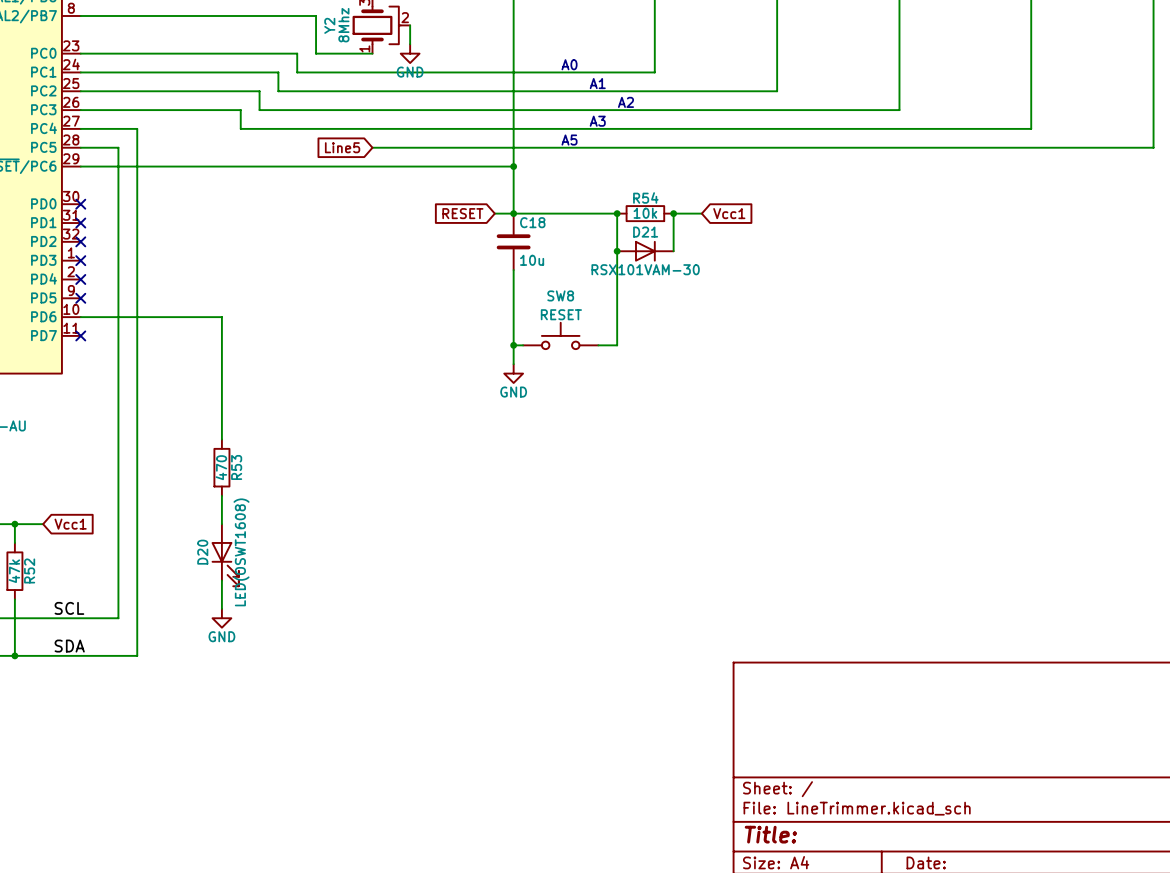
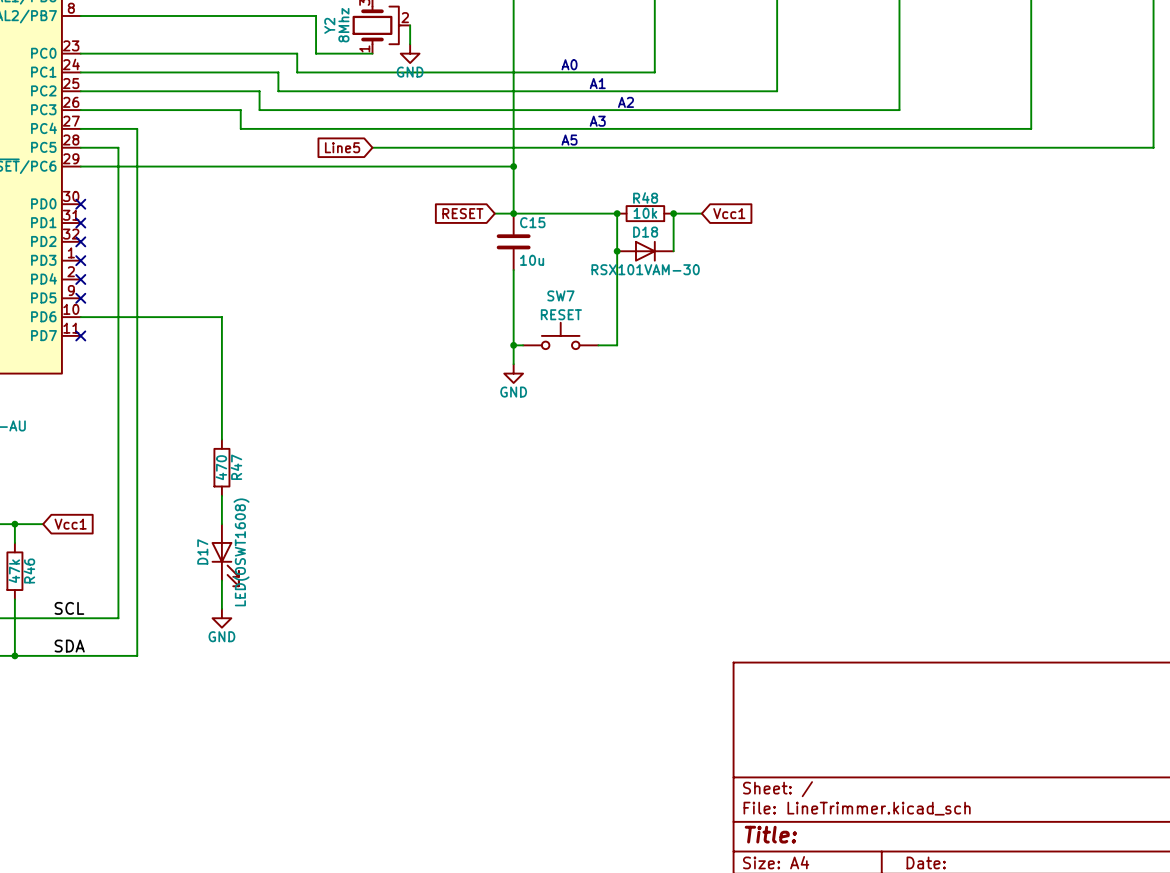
R54 name: R54 (645, 197) -> R48 (645, 197)
C18 name: C18 (532, 222) -> C15 (532, 222)
D21 name: D21 (645, 232) -> D18 (645, 232)
SW8 name: SW8 (560, 295) -> SW7 (560, 295)
R53 name: R53 (236, 467) -> R47 (236, 467)
D20 name: D20 (202, 552) -> D17 (202, 551)
R52 name: R52 (29, 570) -> R46 (29, 570)

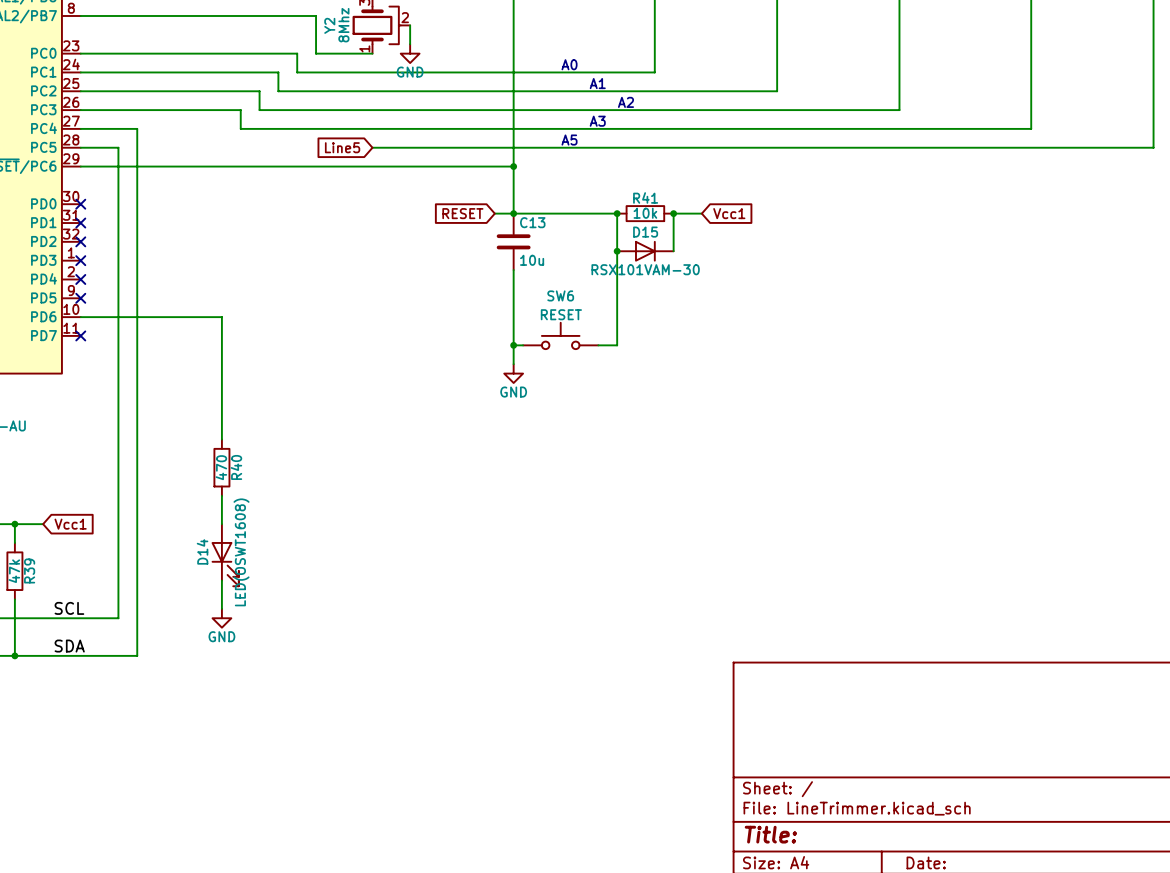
R48 name: R48 (645, 197) -> R41 (645, 197)
C15 name: C15 (532, 222) -> C13 (532, 222)
D18 name: D18 (645, 232) -> D15 (645, 232)
SW7 name: SW7 (560, 295) -> SW6 (560, 295)
R47 name: R47 (236, 467) -> R40 (236, 467)
D17 name: D17 (202, 551) -> D14 (202, 551)
R46 name: R46 (29, 570) -> R39 (29, 570)

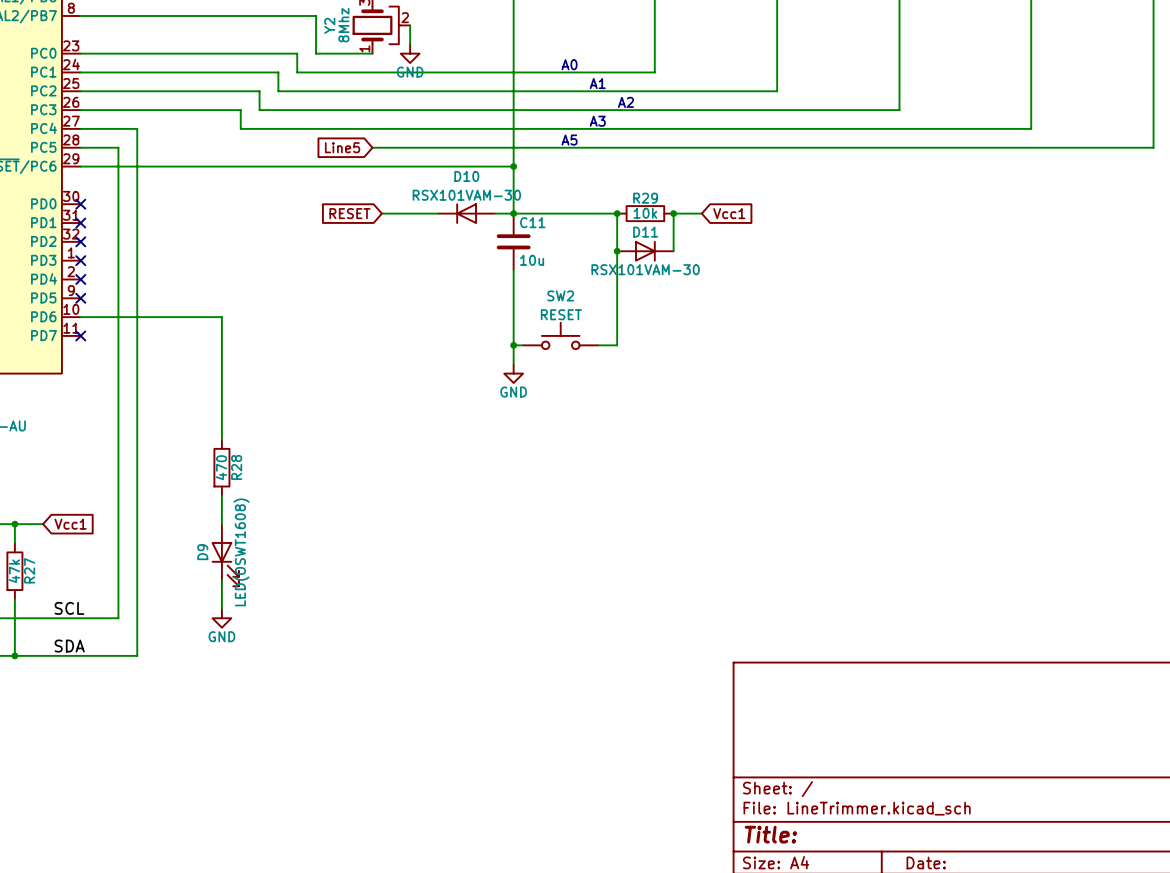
R41 name: R41 (645, 197) -> R29 (645, 198)
wire: none -> (381, 213) (438, 213)
global label position: RESET (462, 213) -> RESET (349, 213)
D10: none -> RSX101VAM-30 (466, 213)
C13 name: C13 (532, 222) -> C11 (532, 222)
D15 name: D15 (645, 232) -> D11 (645, 232)
SW6 name: SW6 (560, 295) -> SW2 (560, 295)
R40 name: R40 (236, 467) -> R28 (236, 467)
D14 name: D14 (202, 551) -> D9 (202, 552)
R39 name: R39 (29, 570) -> R27 (29, 570)

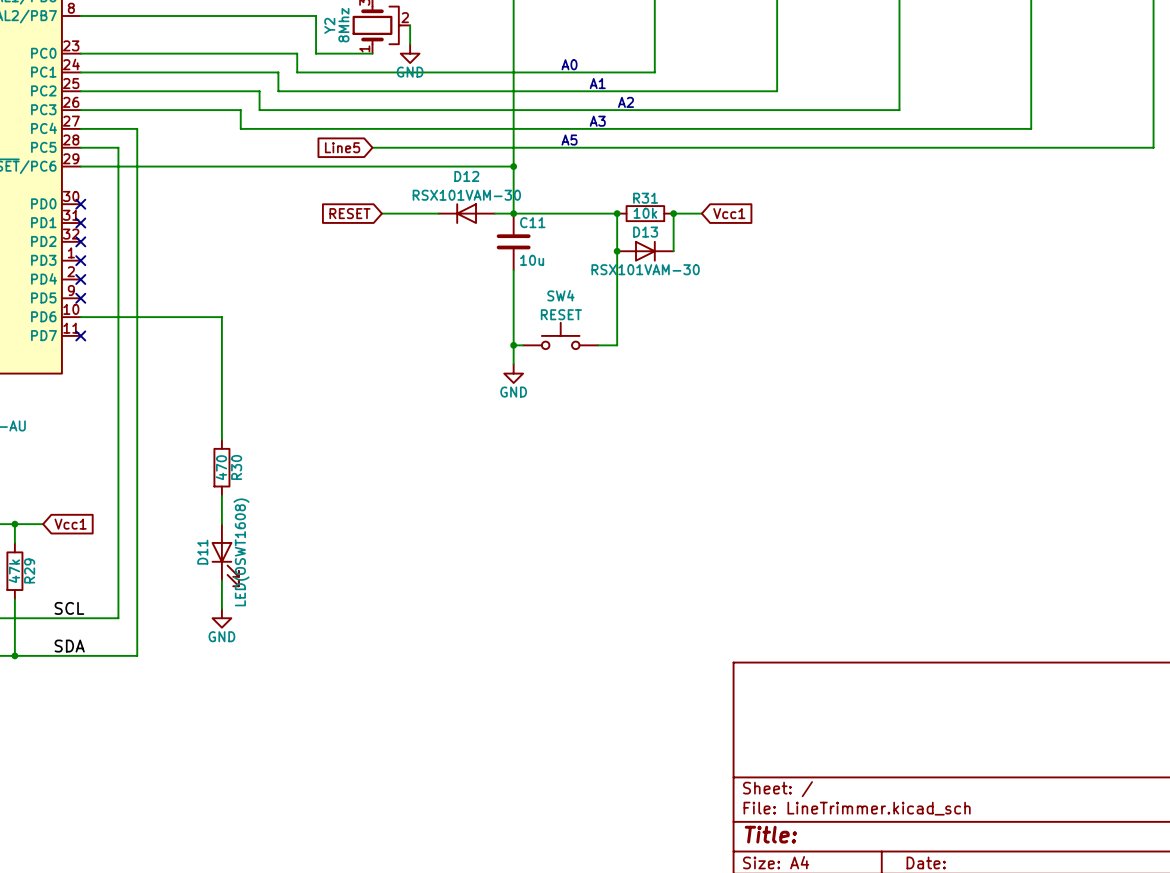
D10 name: D10 (466, 176) -> D12 (466, 176)
R29 name: R29 (645, 198) -> R31 (645, 198)
D11 name: D11 (645, 232) -> D13 (645, 232)
SW2 name: SW2 (560, 295) -> SW4 (560, 295)
R28 name: R28 (236, 467) -> R30 (236, 467)
D9 name: D9 (202, 552) -> D11 (202, 552)
R27 name: R27 (29, 570) -> R29 (29, 570)

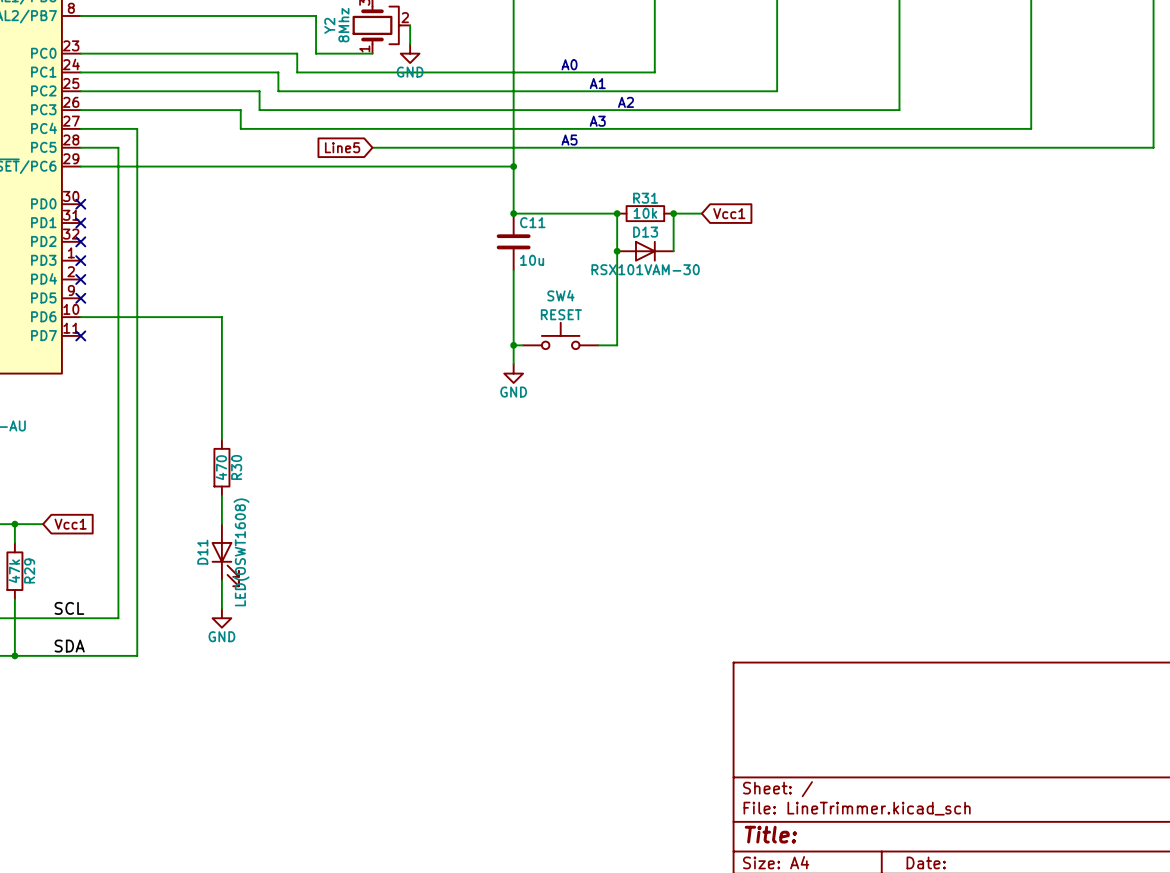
global label: RESET (349, 213) -> none
wire: (381, 213) (438, 213) -> none
D12: RSX101VAM-30 (466, 213) -> none
wire: (494, 213) (513, 213) -> none

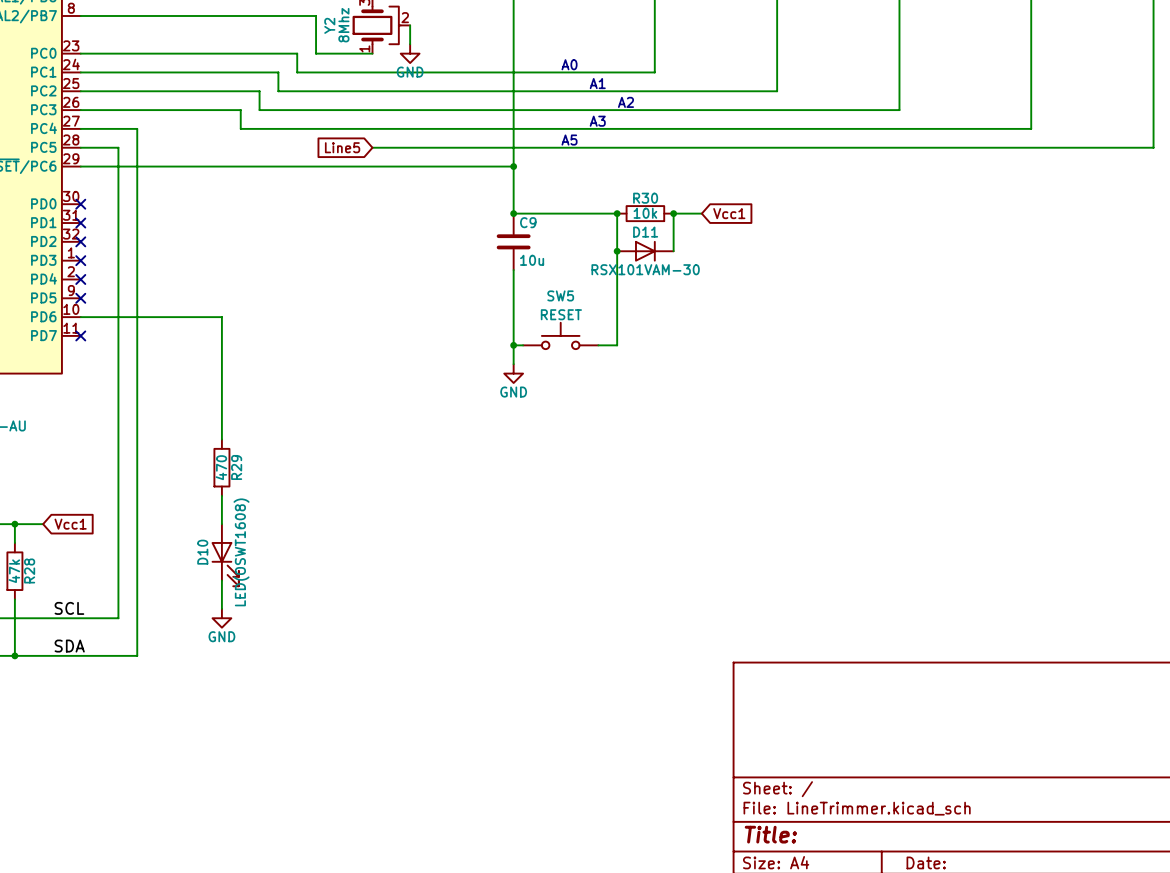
R31 name: R31 (645, 198) -> R30 (645, 198)
C11 name: C11 (532, 222) -> C9 (528, 222)
D13 name: D13 (645, 232) -> D11 (645, 232)
SW4 name: SW4 (560, 295) -> SW5 (560, 295)
R30 name: R30 (236, 467) -> R29 (236, 467)
D11 name: D11 (202, 552) -> D10 (202, 552)
R29 name: R29 (29, 570) -> R28 (29, 570)

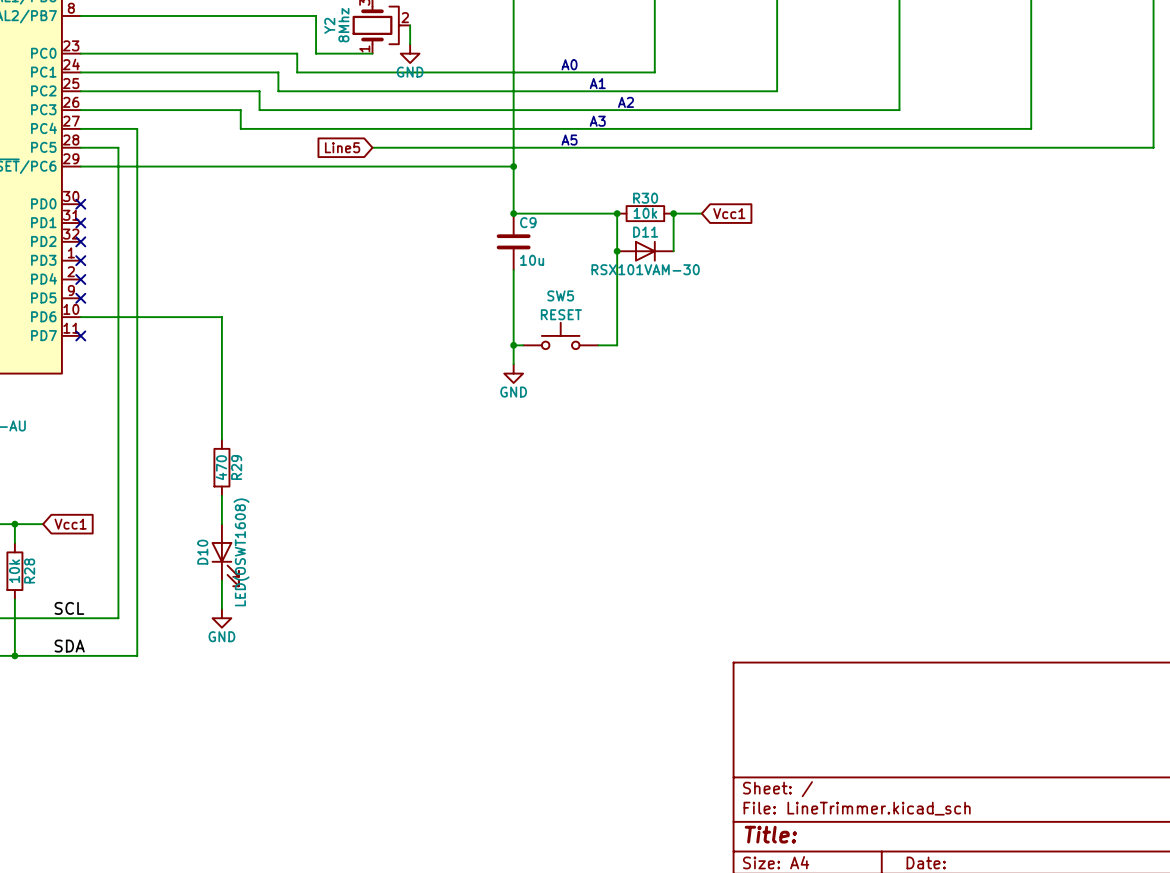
R28 value: 47k (14, 571) -> 10k (14, 571)

